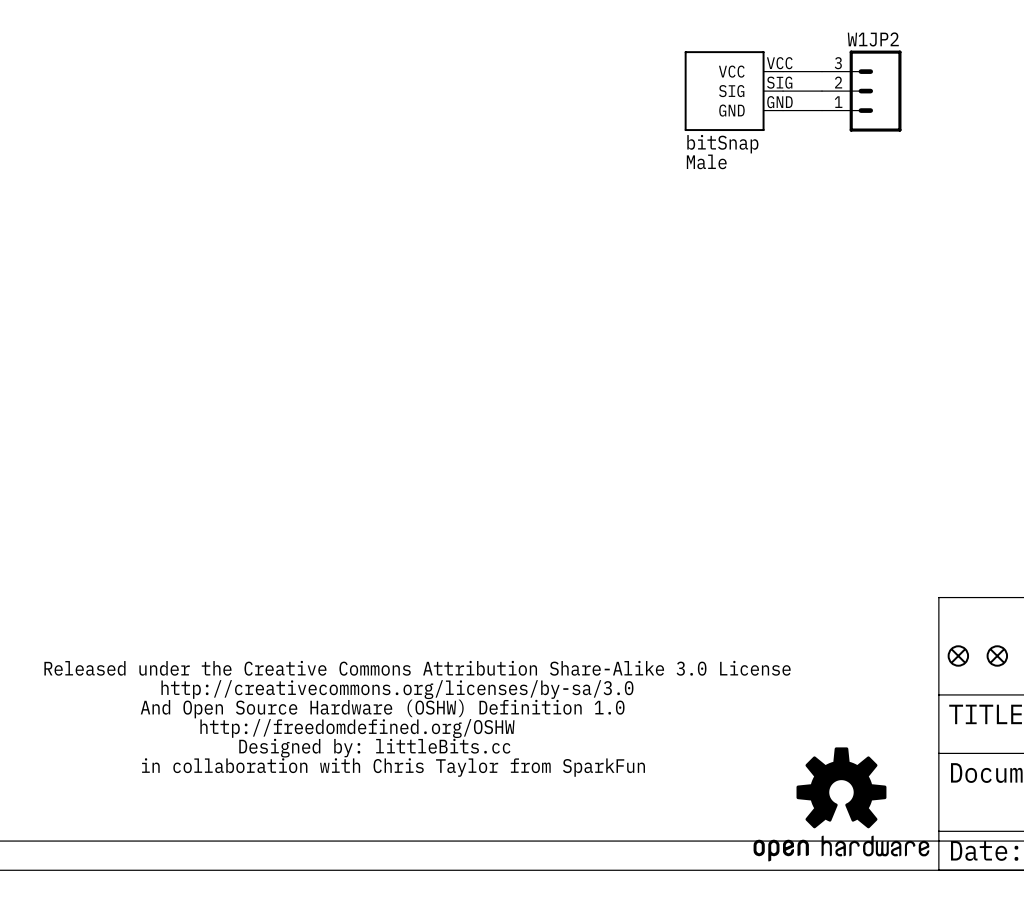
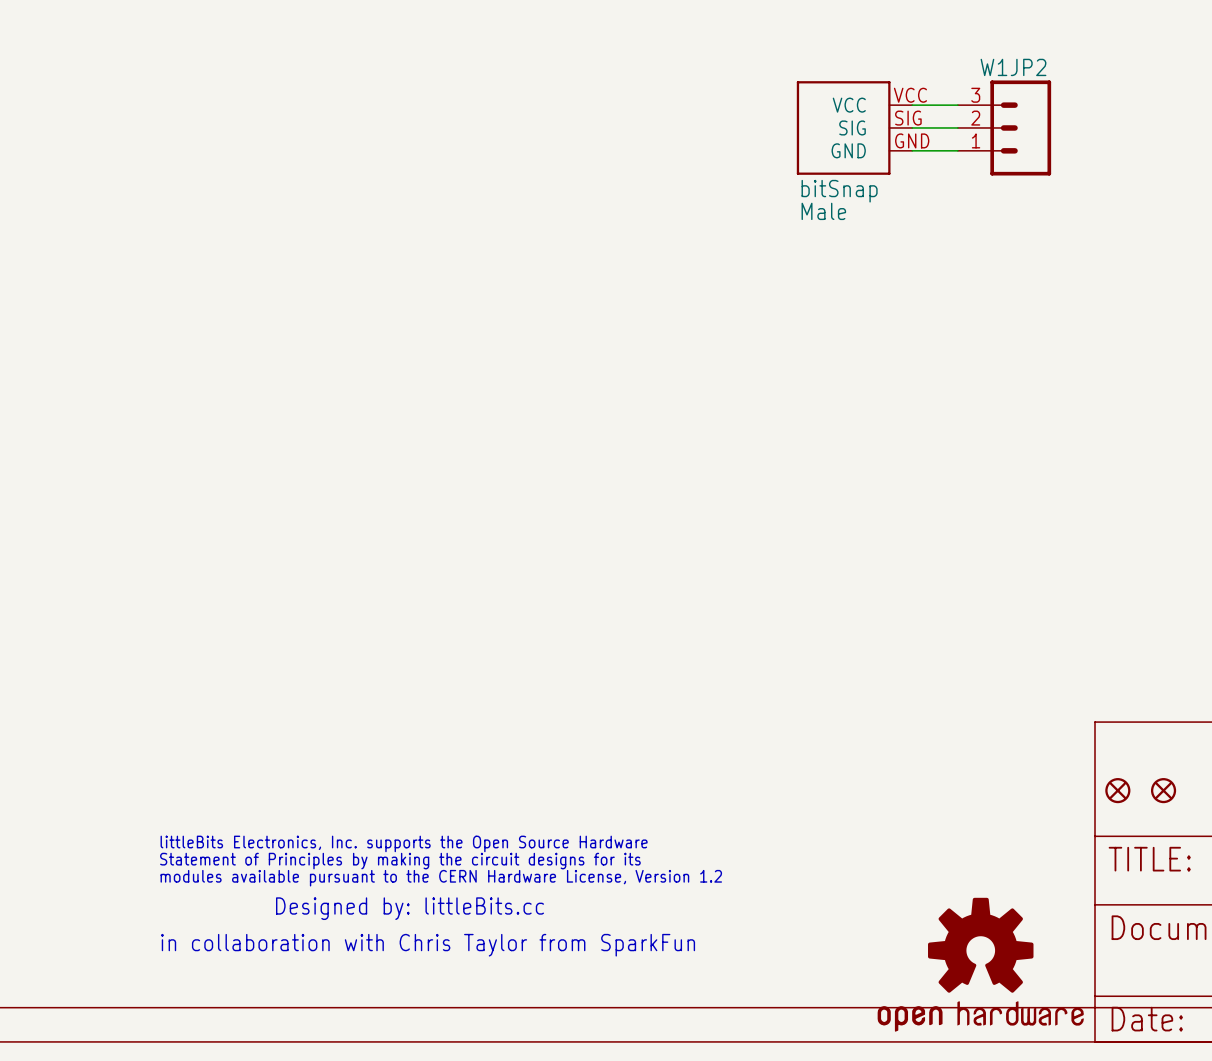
part: (417, 718) -> none
part: none -> (441, 877)
text: none -> in collaboration with Chris Taylor from SparkFun (428, 945)

